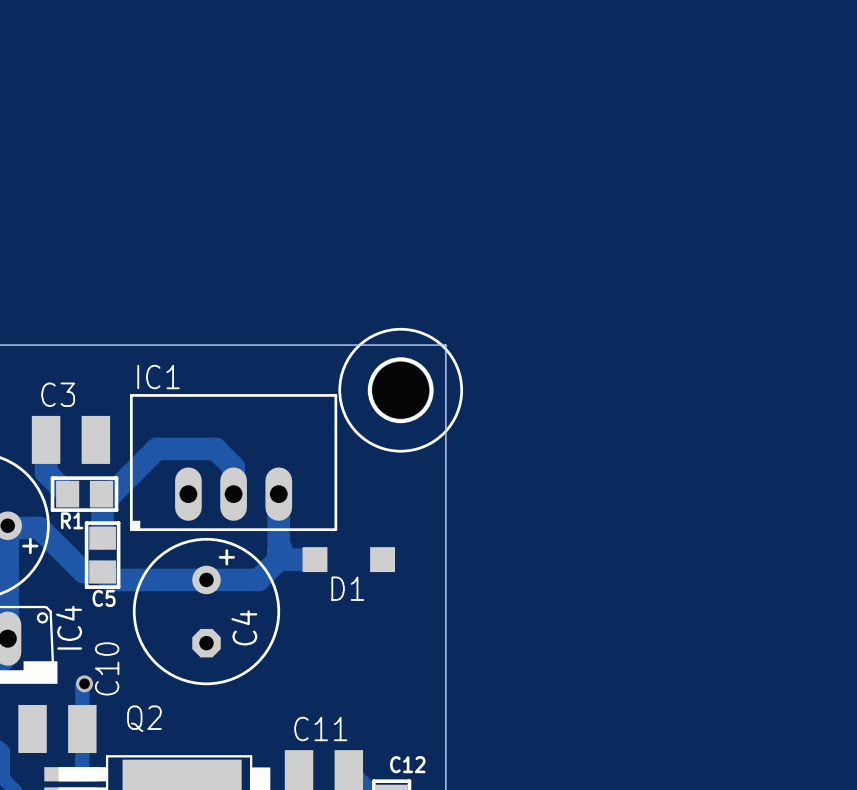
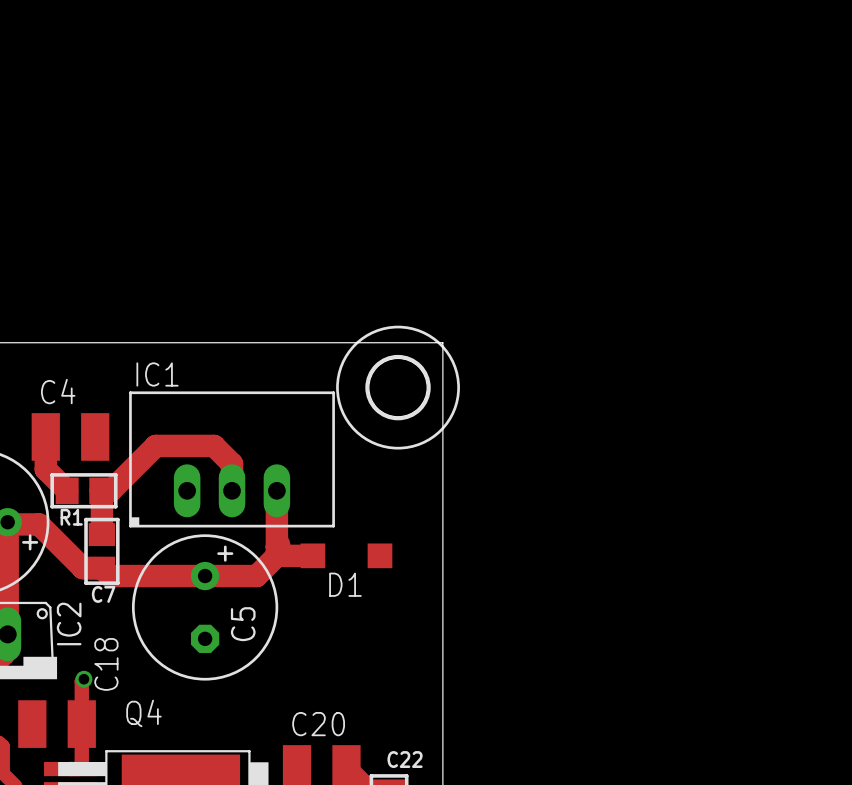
C3 name: C3 (58, 394) -> C4 (58, 391)
C5 name: C5 (104, 598) -> C7 (103, 594)
IC4 name: IC4 (69, 627) -> IC2 (69, 623)
C4 name: C4 (244, 627) -> C5 (243, 624)
C10 name: C10 (107, 668) -> C18 (106, 664)
Q2 name: Q2 (144, 718) -> Q4 (143, 713)
C11 name: C11 (320, 728) -> C20 (318, 724)
C12 name: C12 (407, 764) -> C22 (405, 759)

